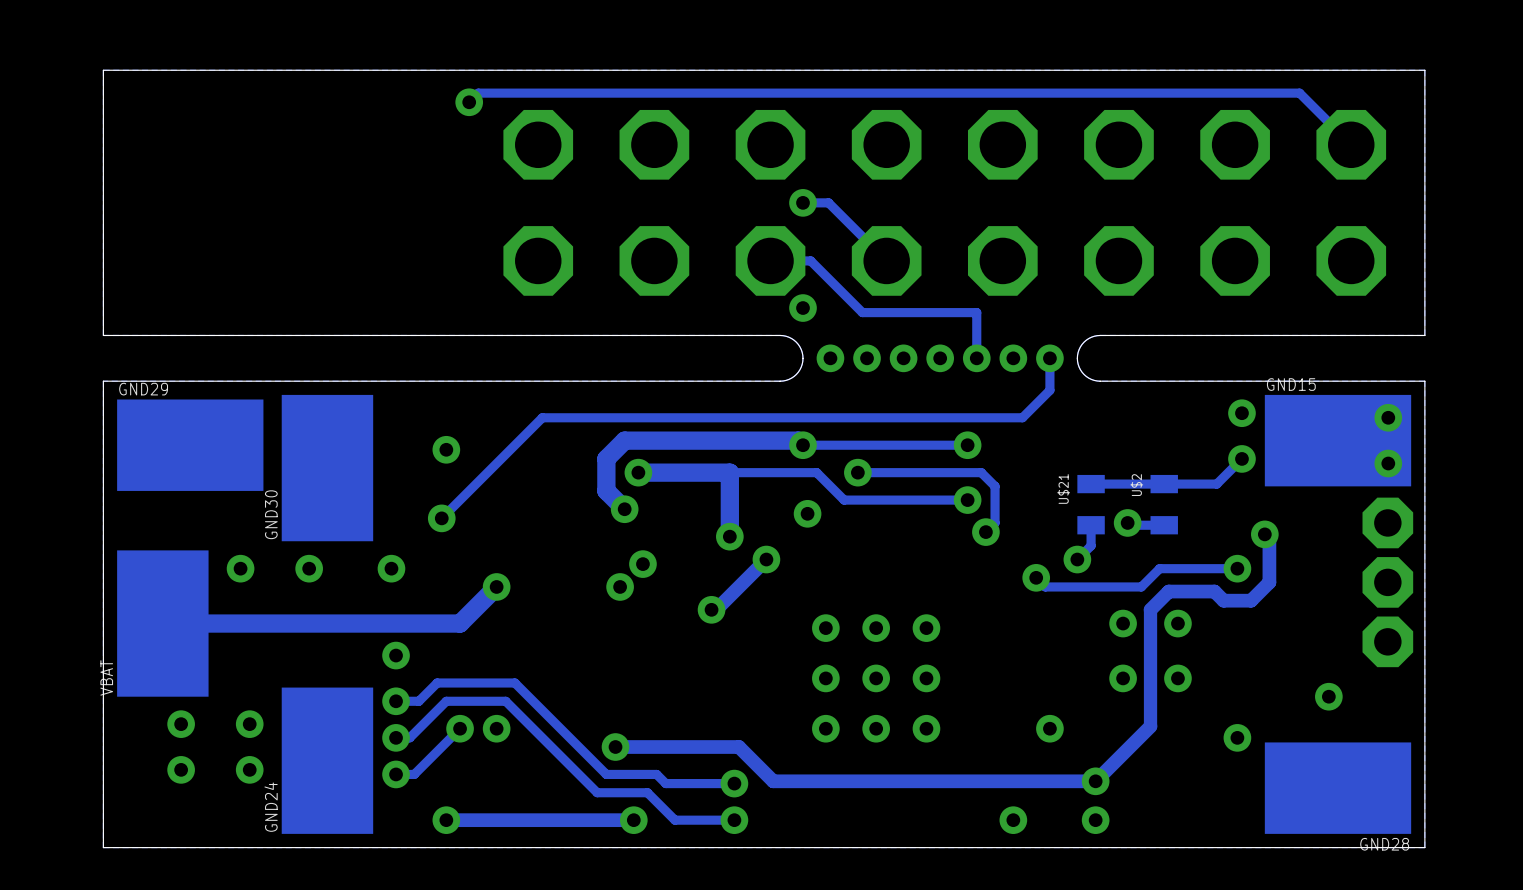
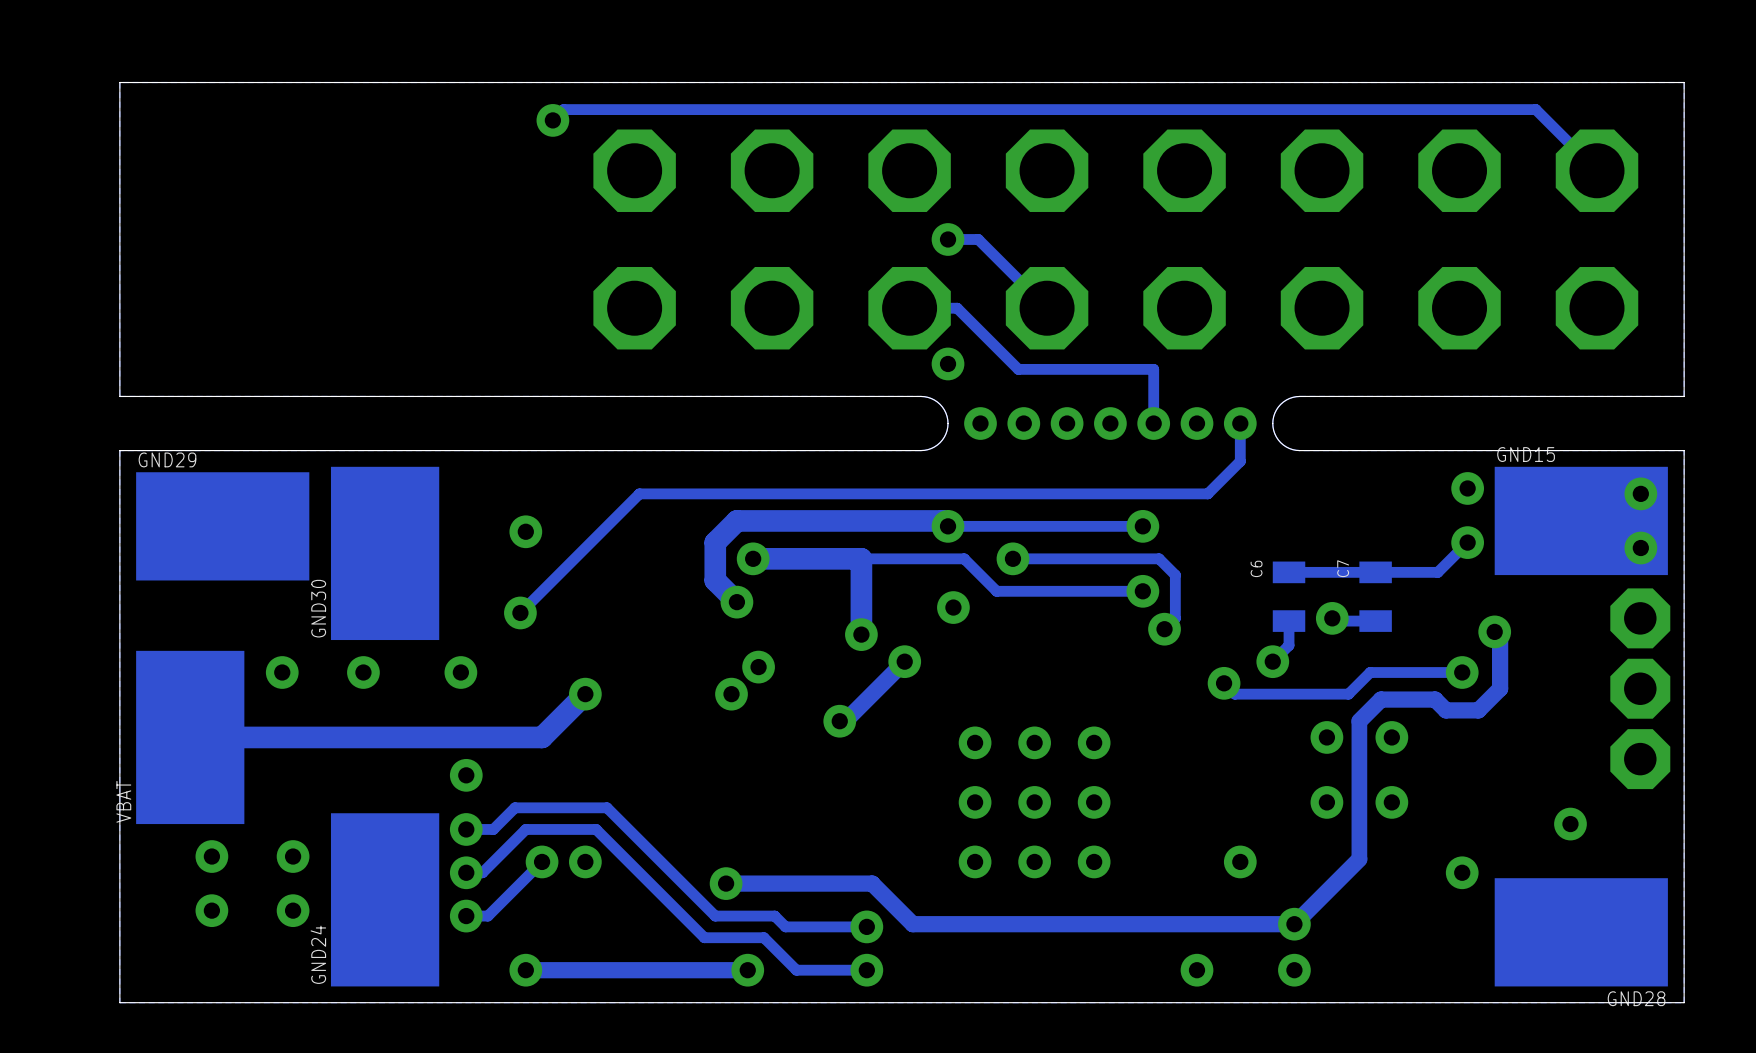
U$2 name: U$2 (1136, 485) -> C7 (1343, 568)
U$21 name: U$21 (1063, 489) -> C6 (1256, 568)

